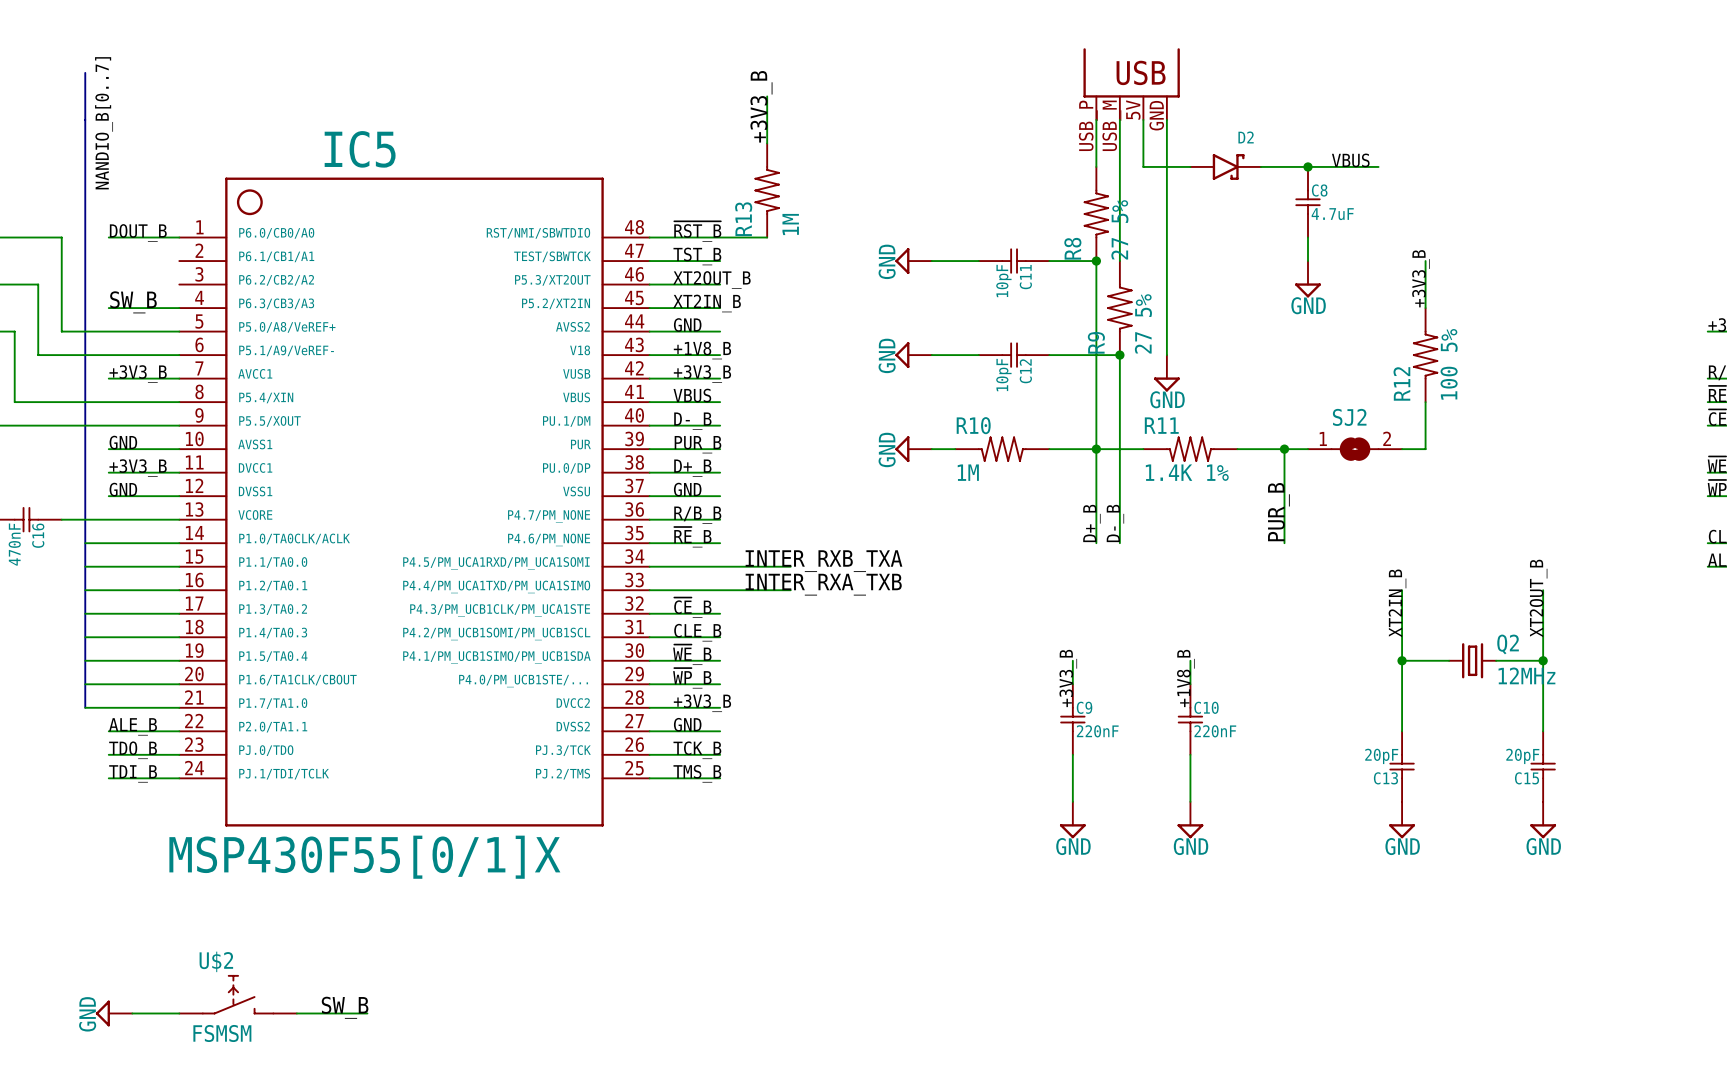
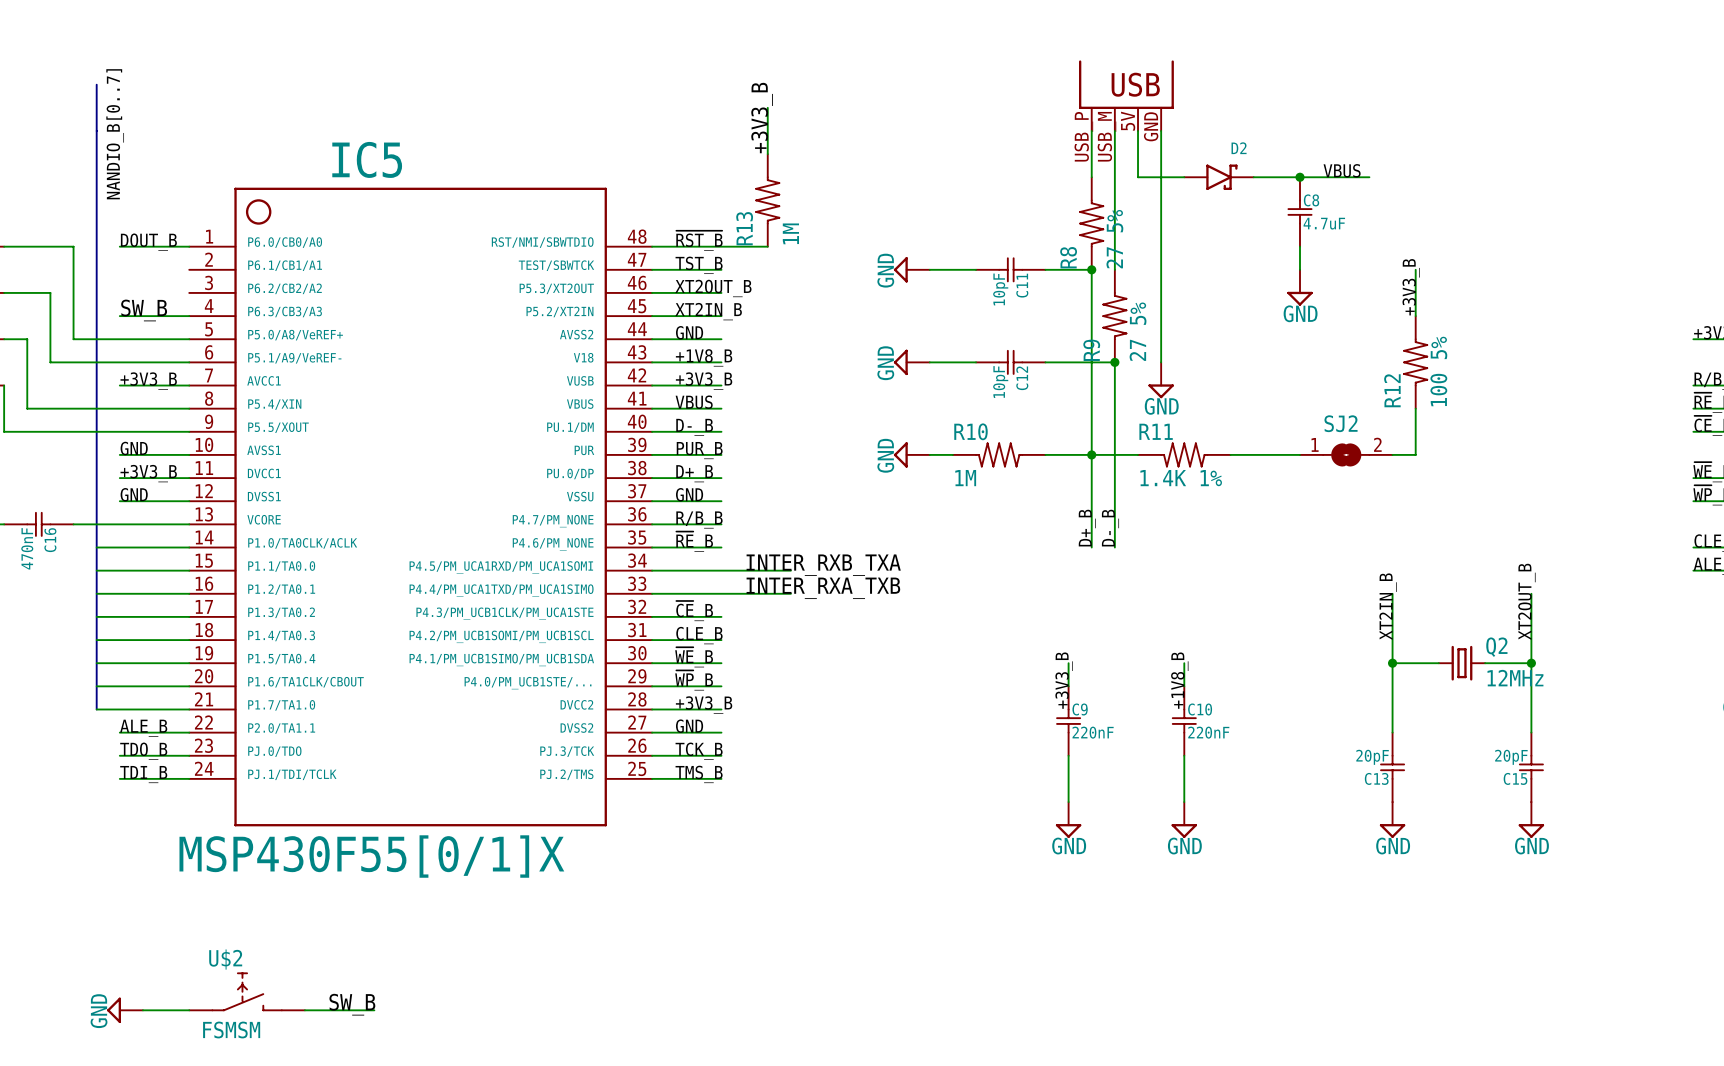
wire: (1284, 449) (1284, 543) -> none
junction: (1284, 449) -> none
label: PUR_B (1278, 512) -> none

